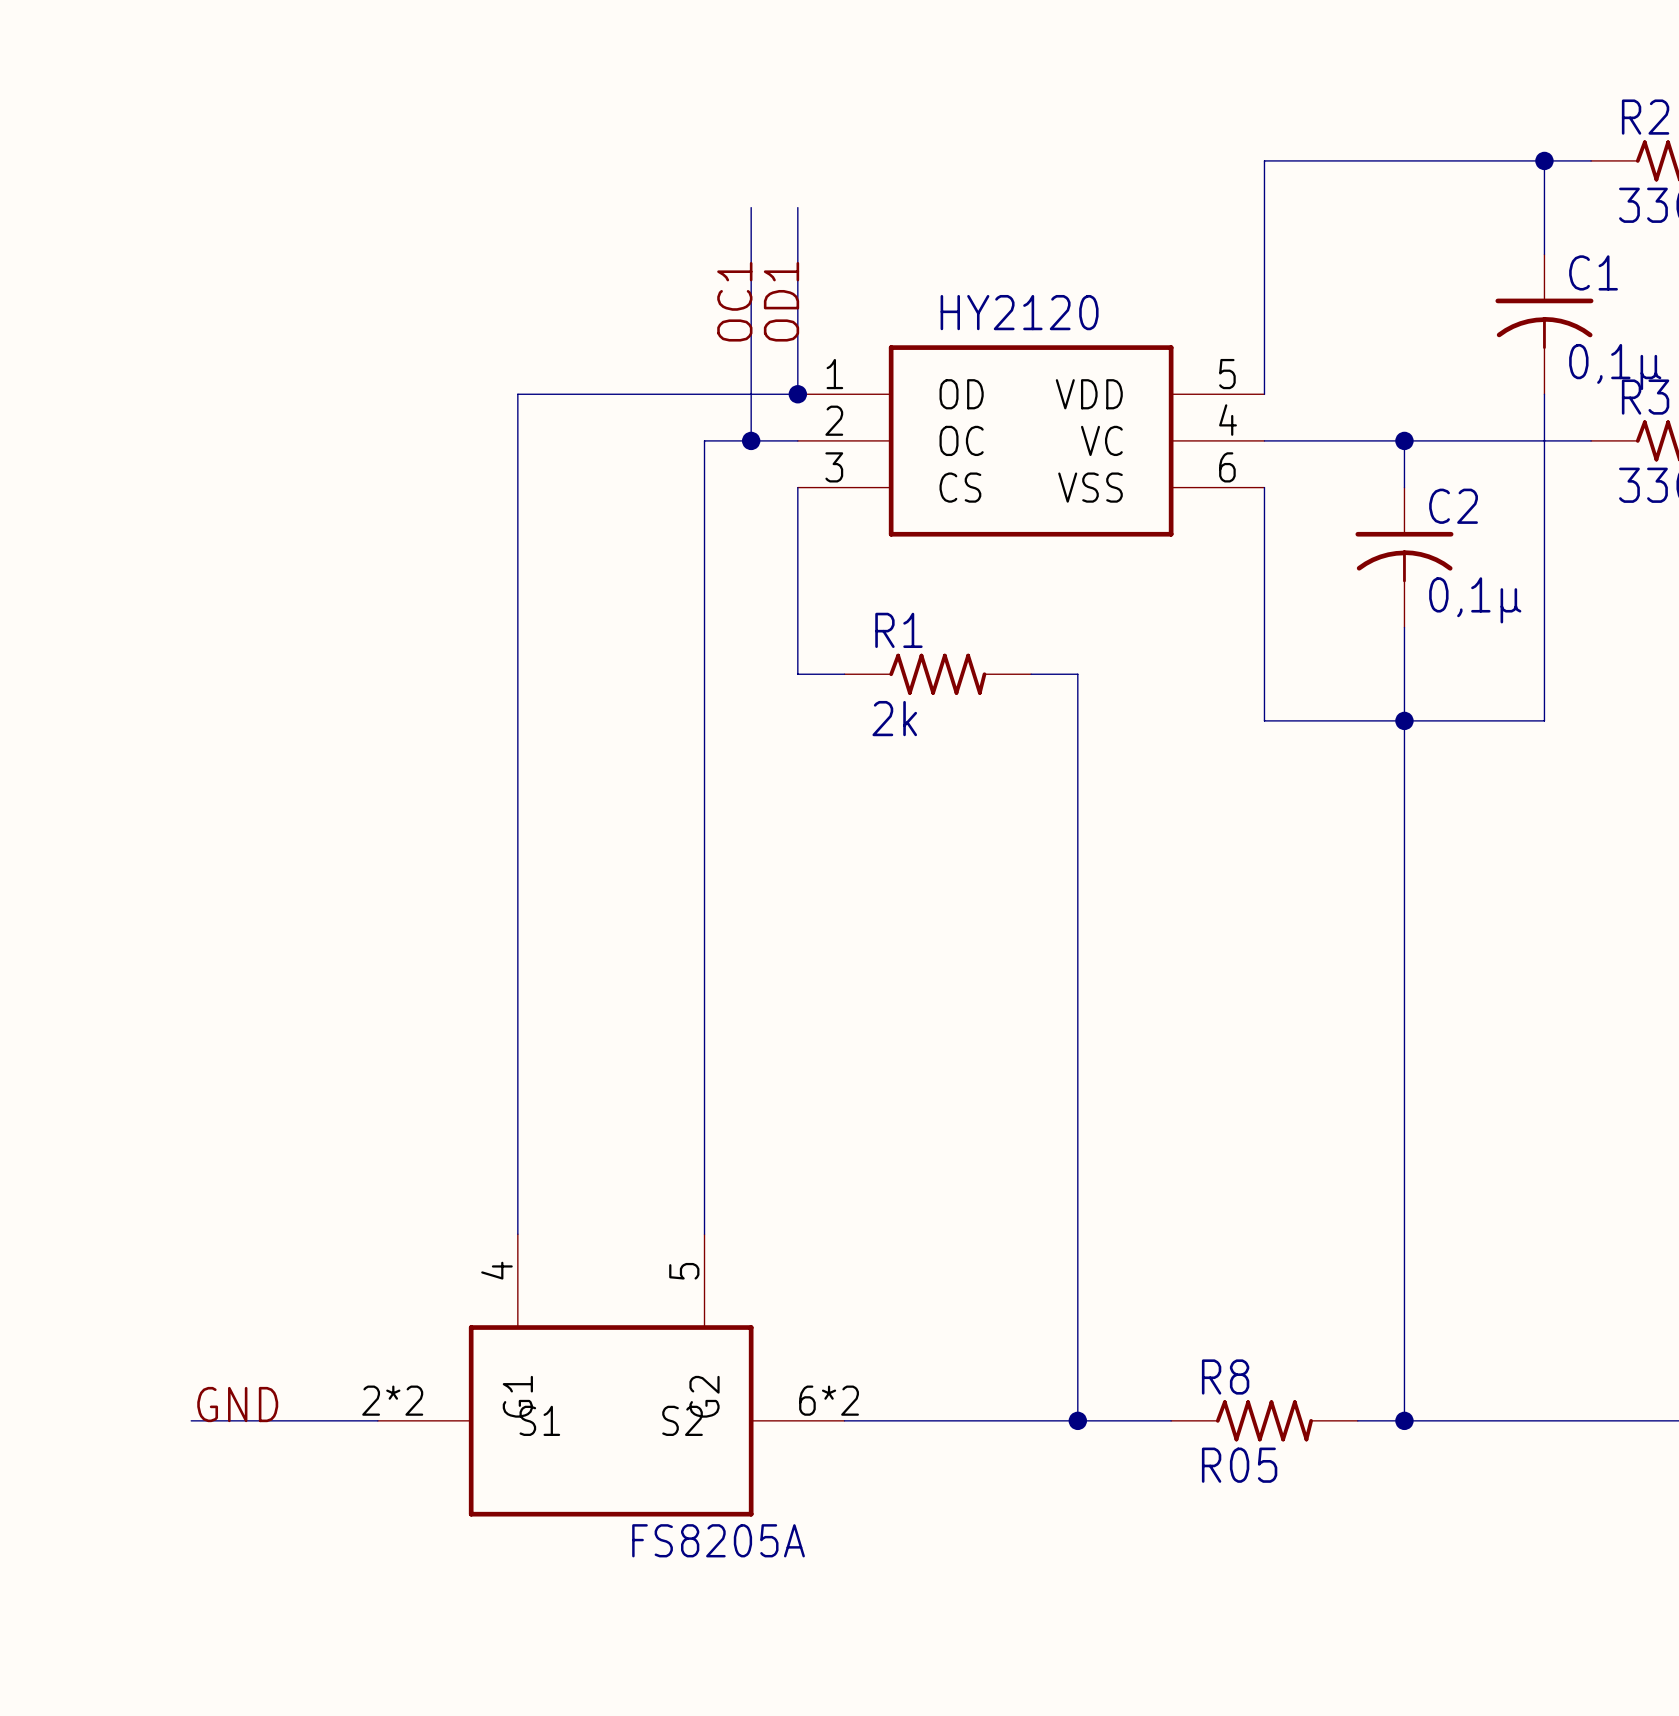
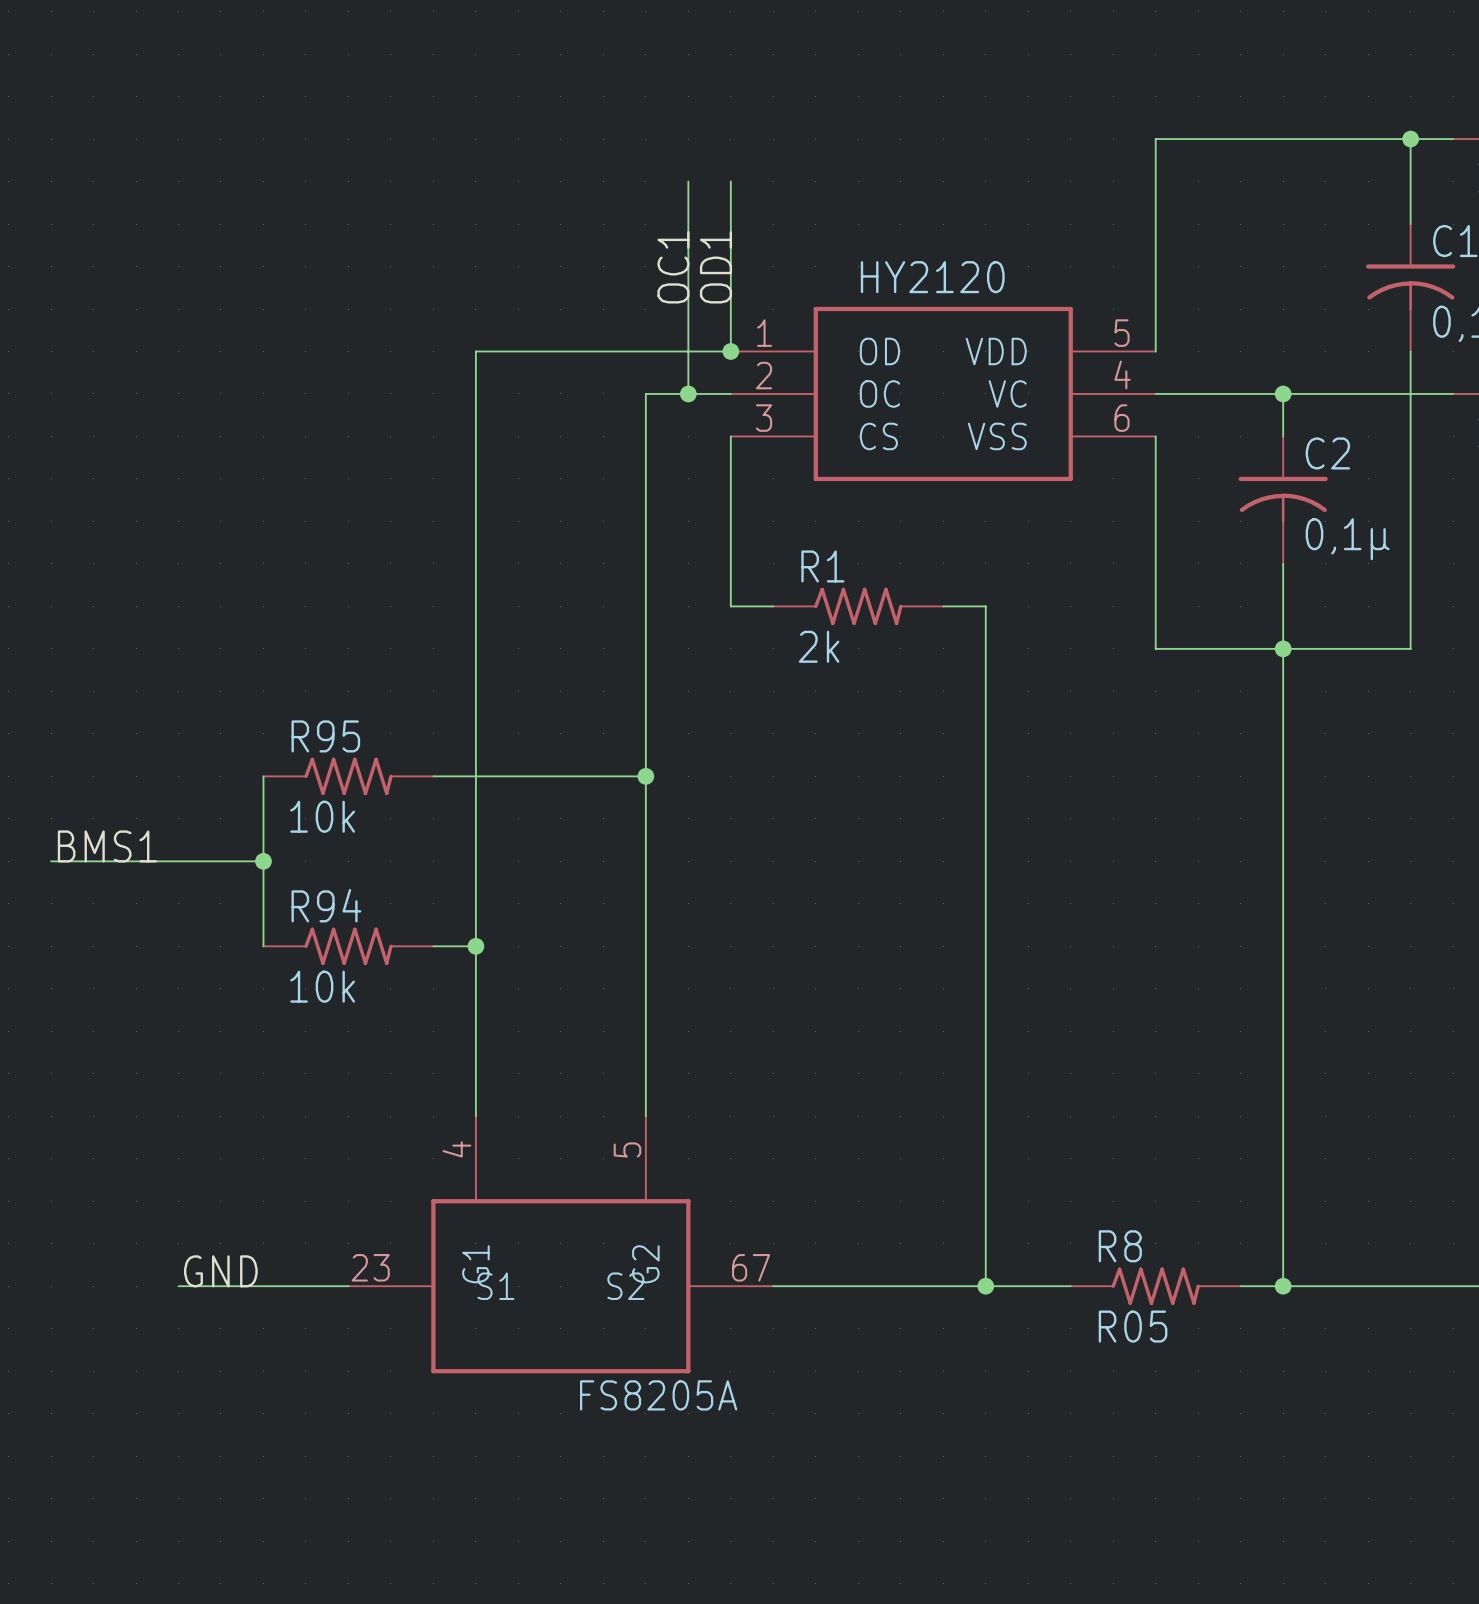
wire: none -> (263, 776) (263, 946)
R95: none -> 10k (348, 776)
wire: none -> (433, 776) (645, 776)
junction: none -> (645, 776)
label: none -> BMS1 (107, 846)
wire: none -> (51, 861) (263, 861)
junction: none -> (263, 861)
R94: none -> 10k (348, 946)
wire: none -> (433, 946) (475, 946)
junction: none -> (475, 946)
part pin number: 2*2 (392, 1400) -> 23 (370, 1267)
part pin number: 6*2 (829, 1400) -> 67 (751, 1267)

